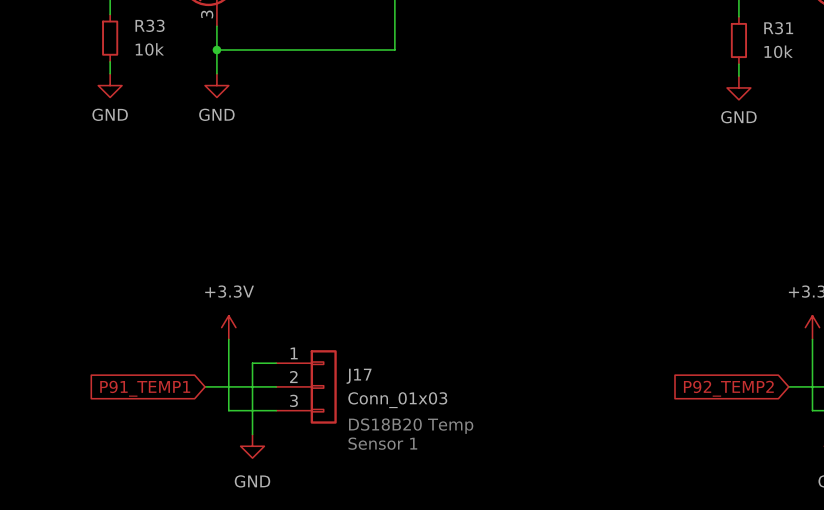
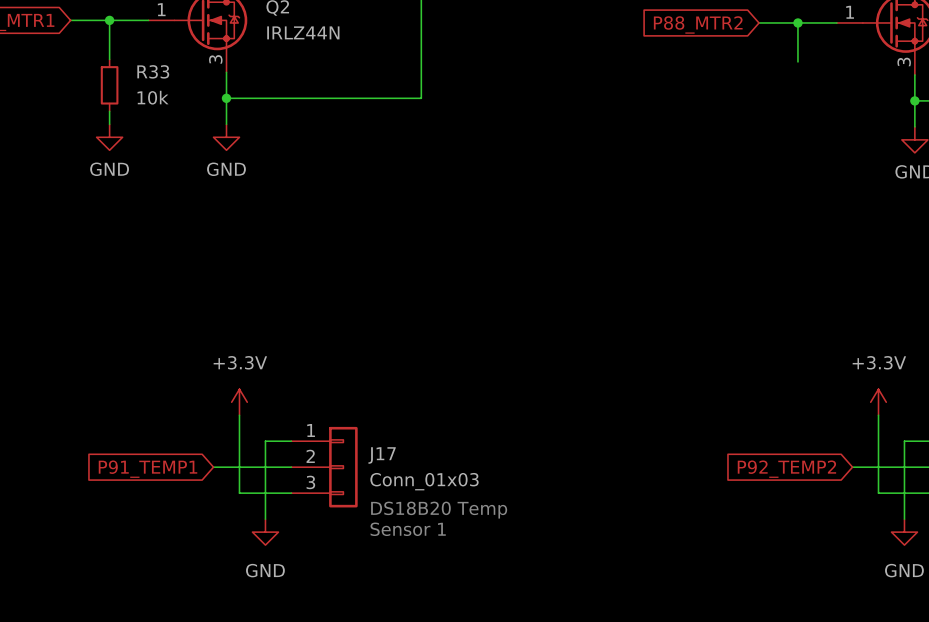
R31: 10k (738, 40) -> none
wire: (738, 64) (738, 76) -> none
power symbol: GND (738, 87) -> none

